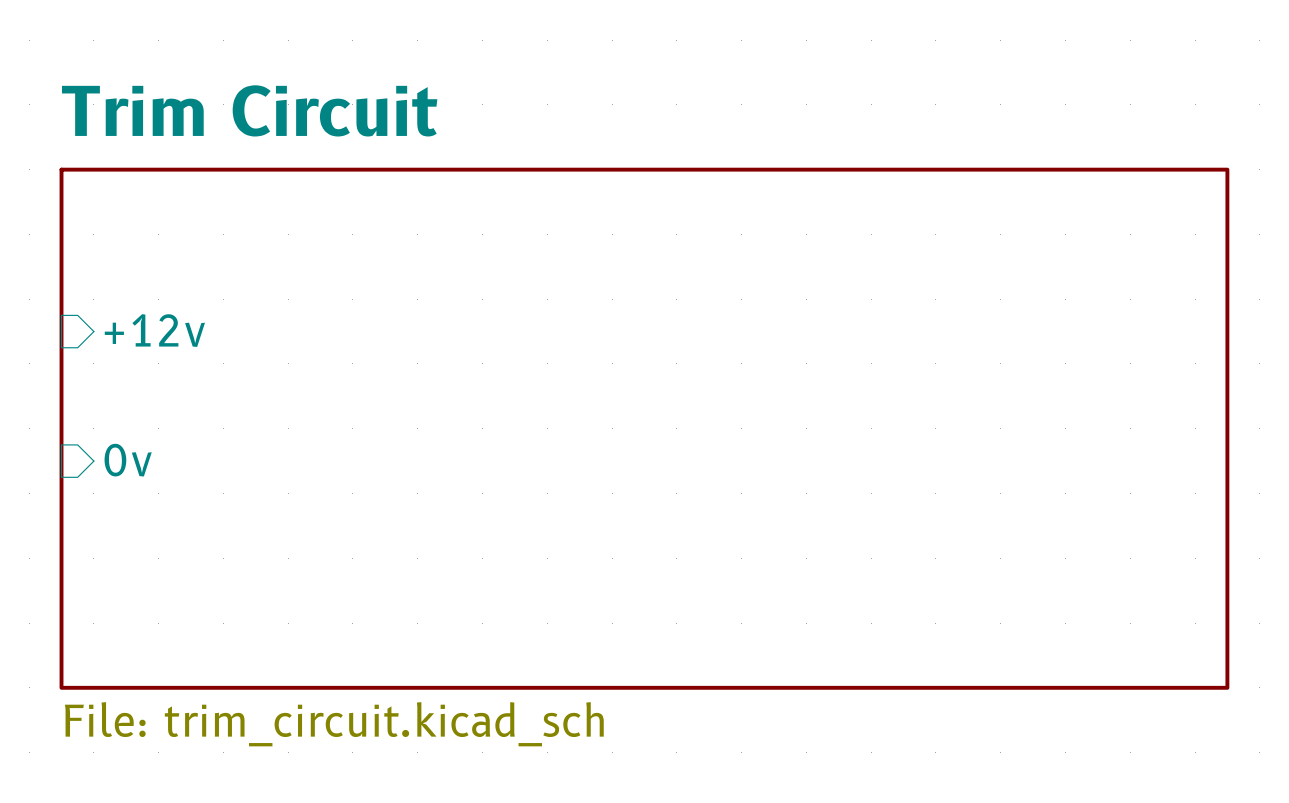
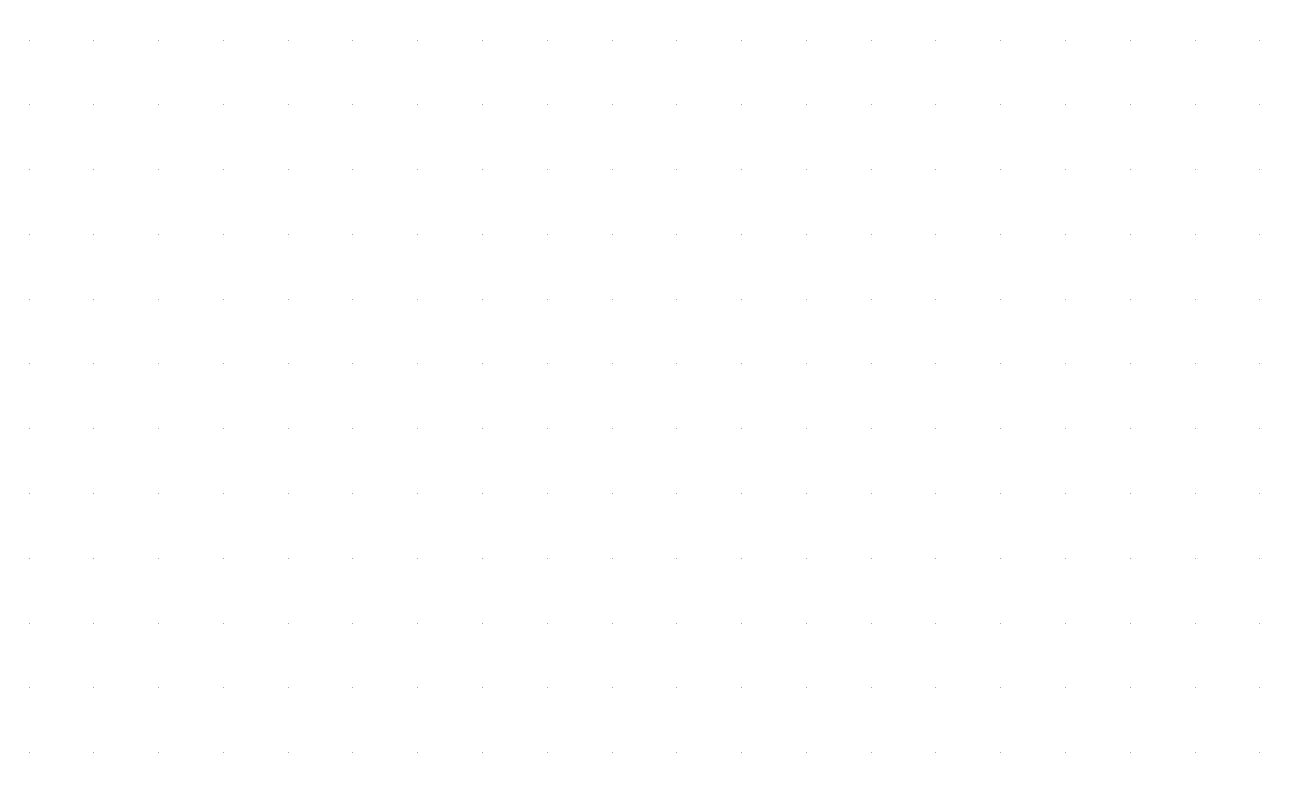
sheet pin: +12v (154, 330) -> none
sheet Trim Circuit: File: trim_circuit.kicad_sch (644, 428) -> none
sheet pin: 0v (128, 460) -> none

